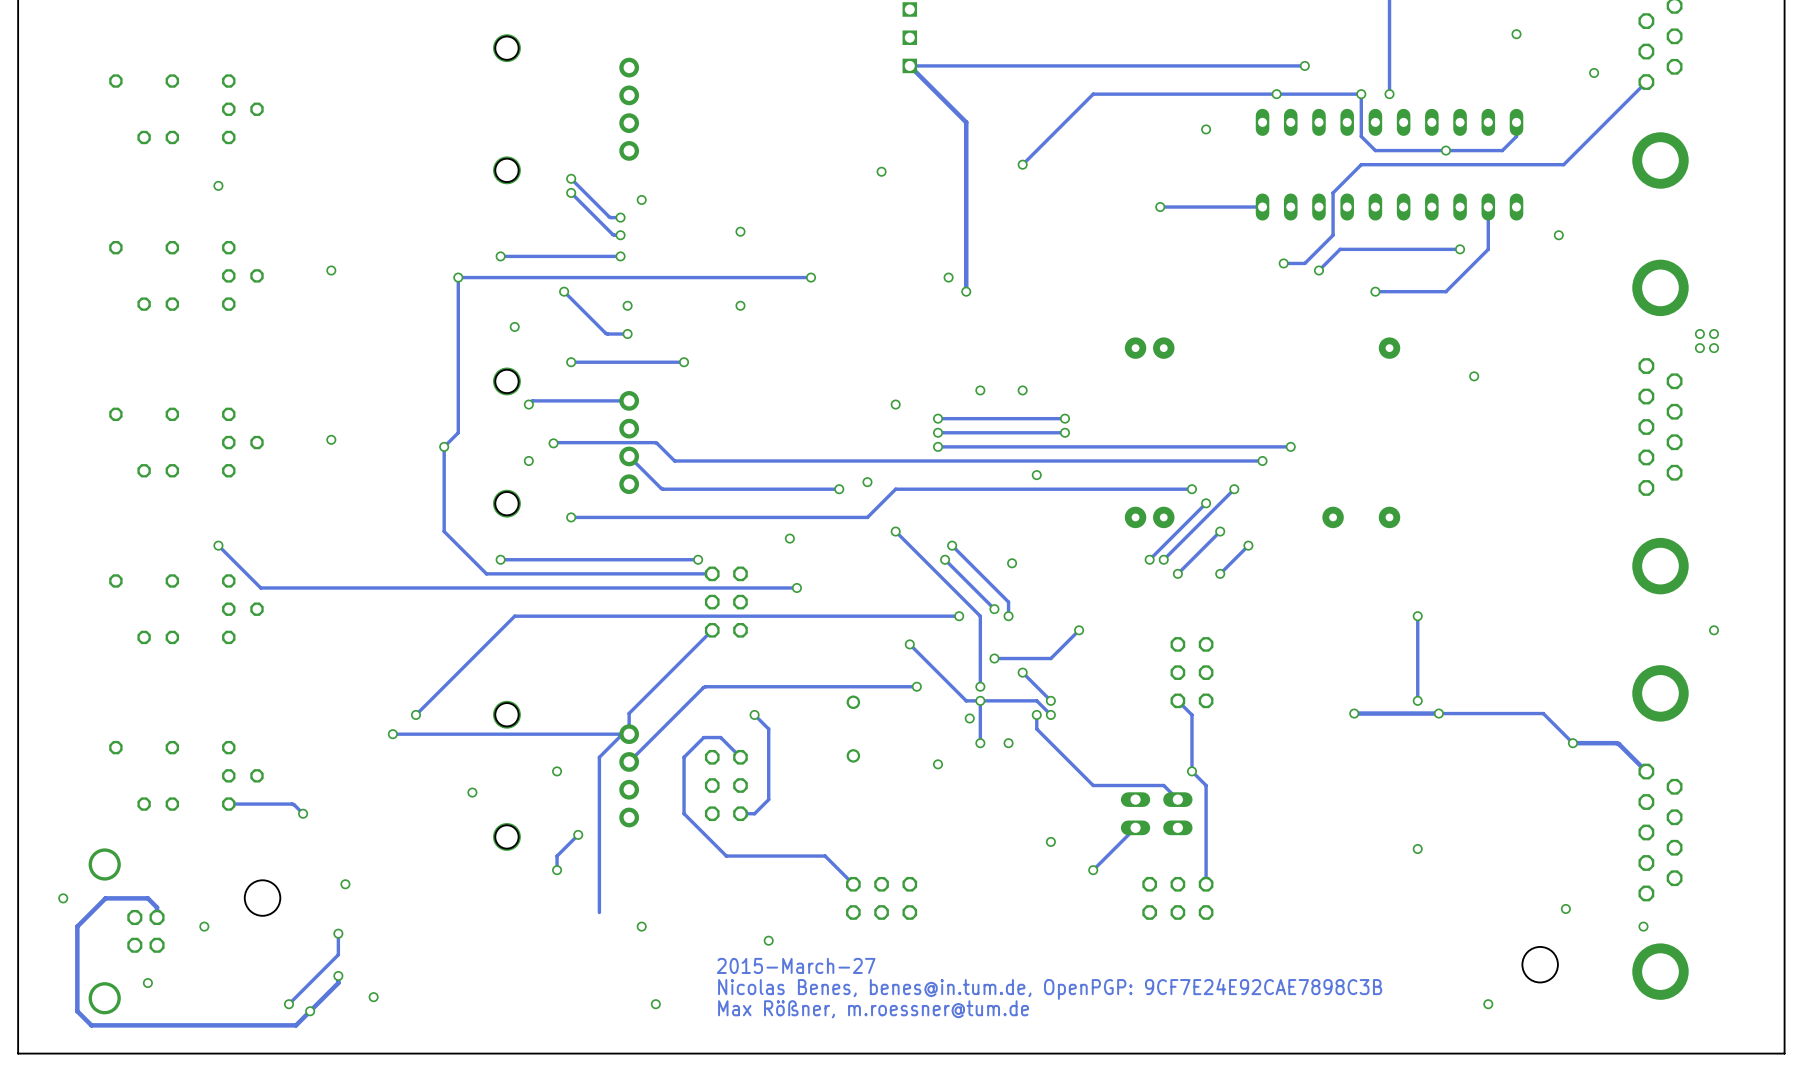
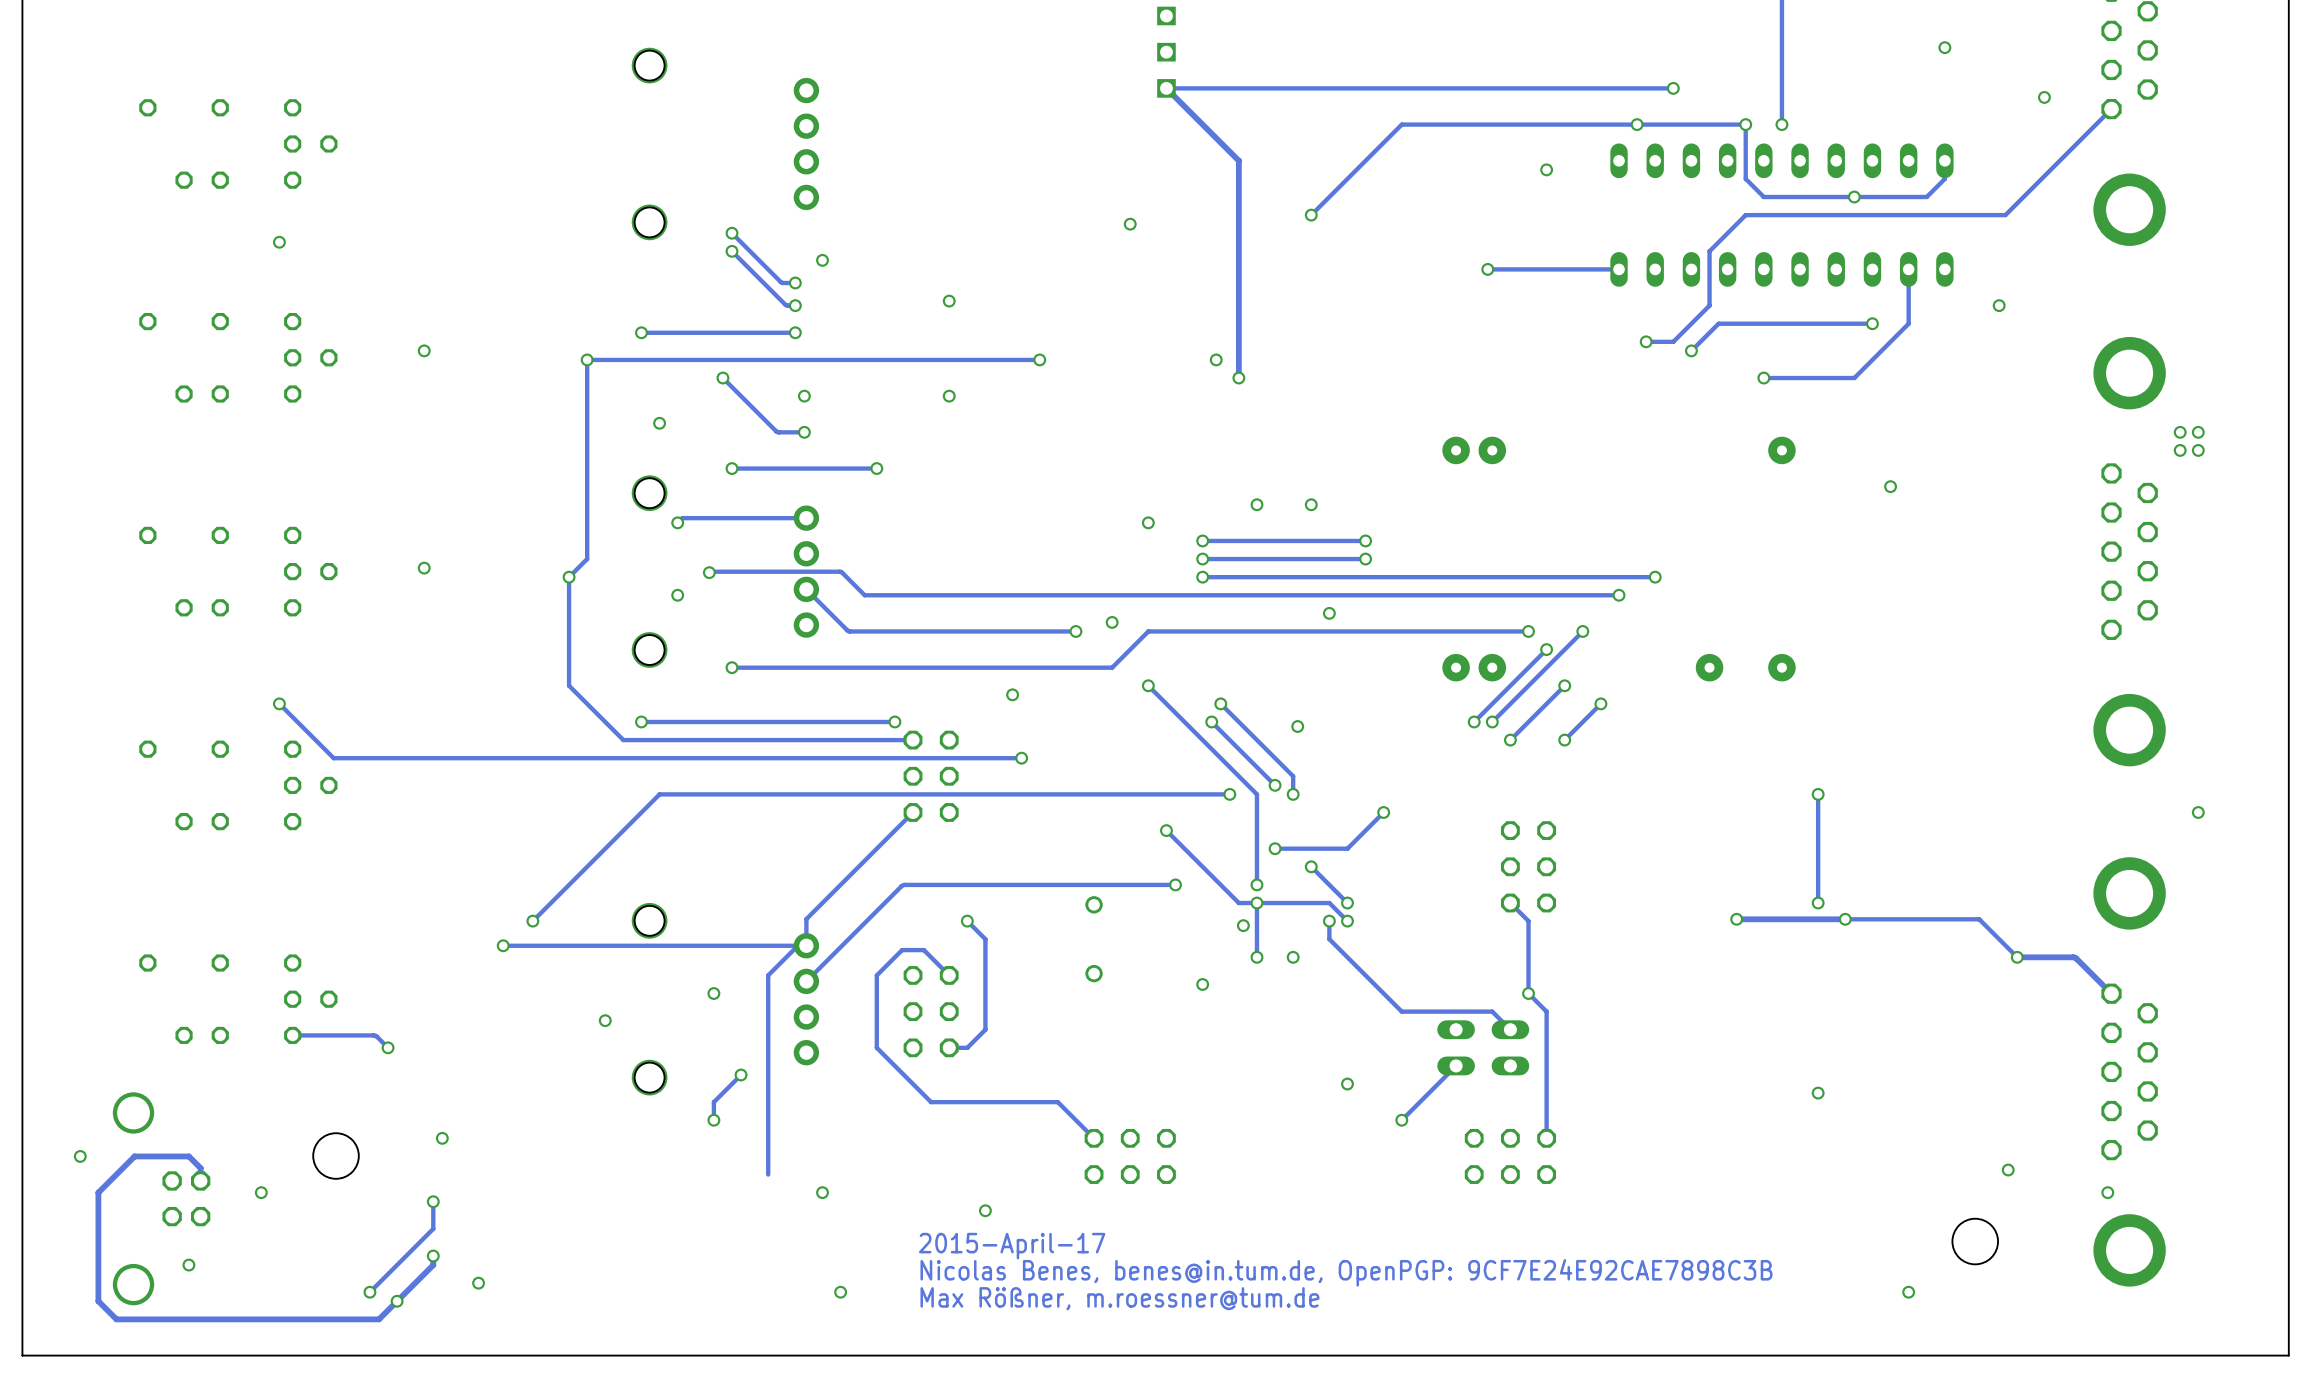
text: 2015-March-27 (796, 965) -> 2015-April-17 (1012, 1246)

